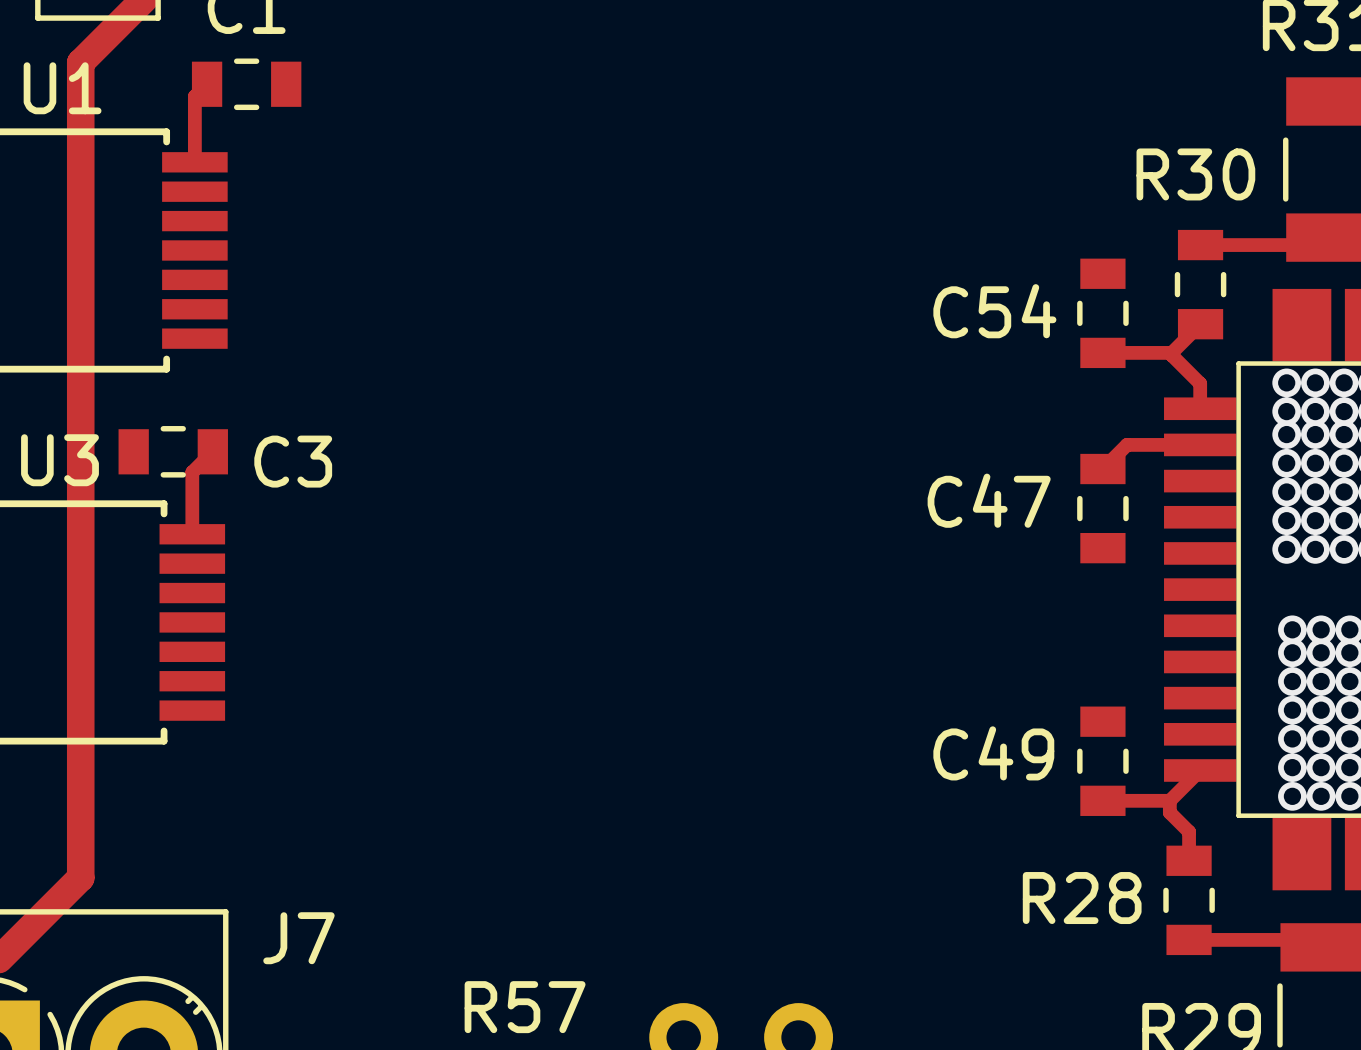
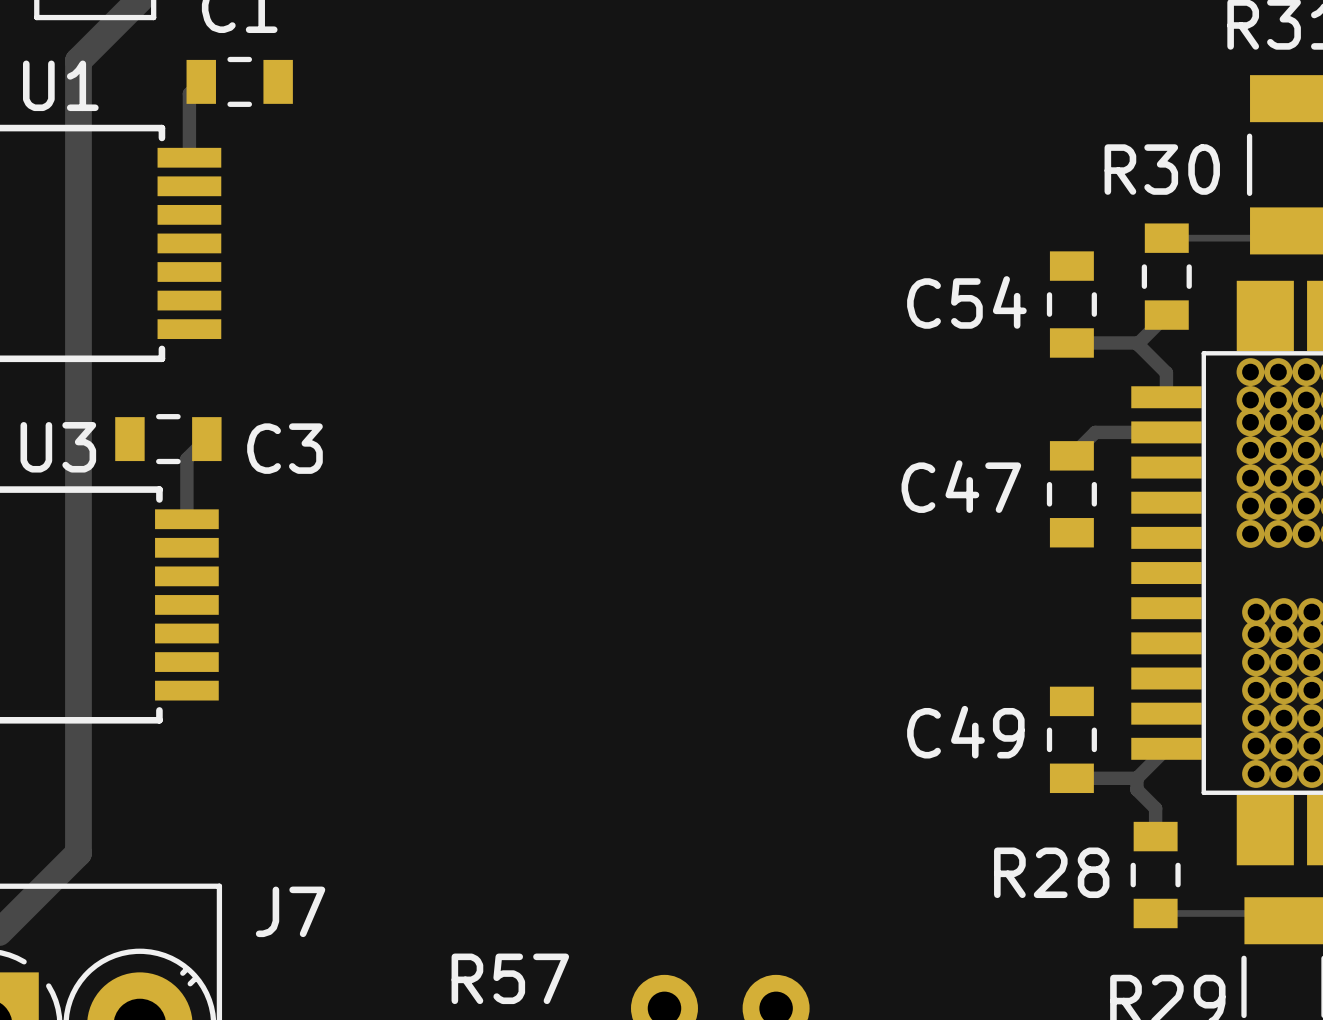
track width: thick (1326, 237) (1319, 245) (1200, 245) -> thin (1289, 230) (1282, 238) (1166, 238)
track width: thick (1189, 939) (1313, 939) (1321, 947) -> thin (1155, 913) (1276, 913) (1283, 920)

